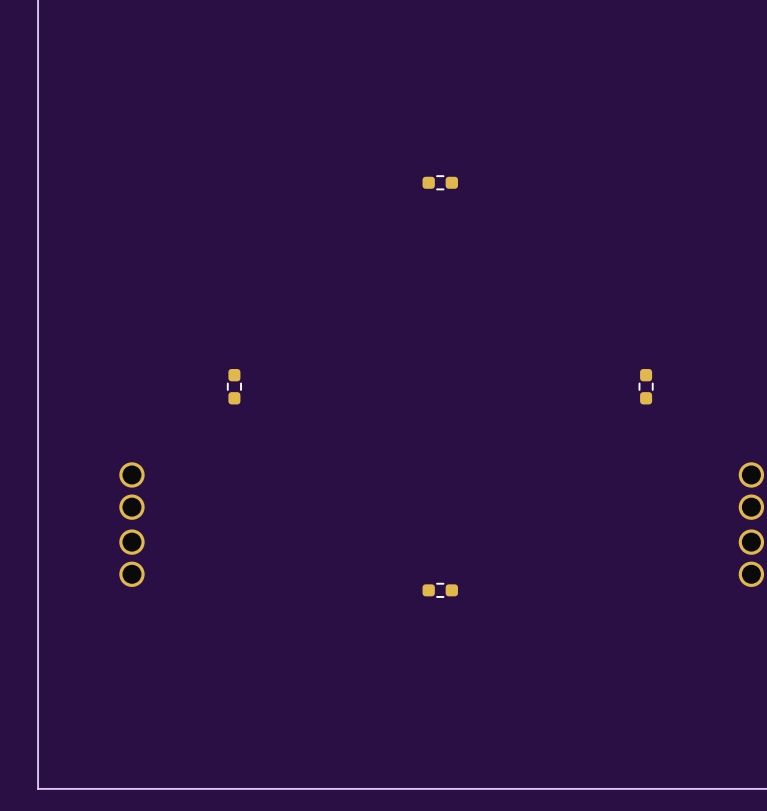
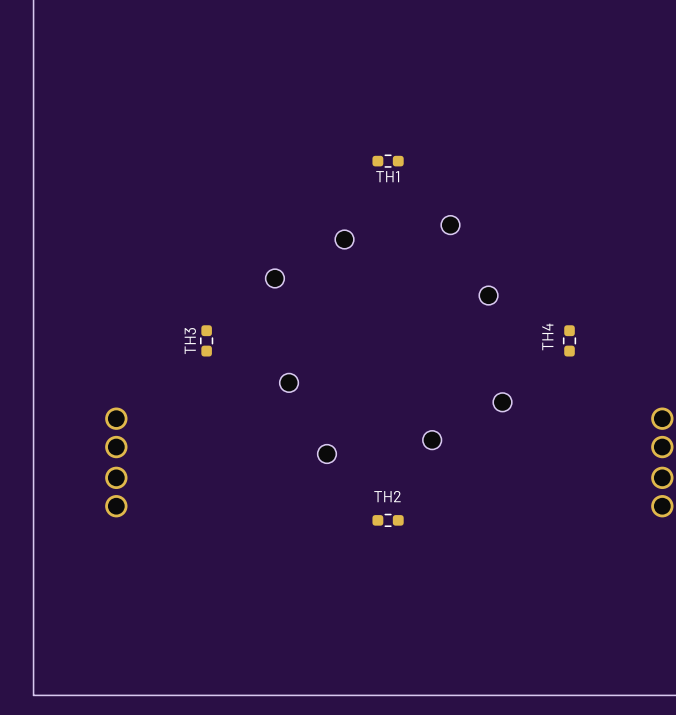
TH1 name: none -> TH1 (387, 176)
part: none -> (450, 225)
part: none -> (344, 239)
part: none -> (274, 278)
part: none -> (488, 295)
TH4 name: none -> TH4 (547, 336)
TH3 name: none -> TH3 (190, 341)
part: none -> (289, 382)
part: none -> (502, 402)
part: none -> (432, 440)
part: none -> (326, 453)
TH2 name: none -> TH2 (387, 496)

